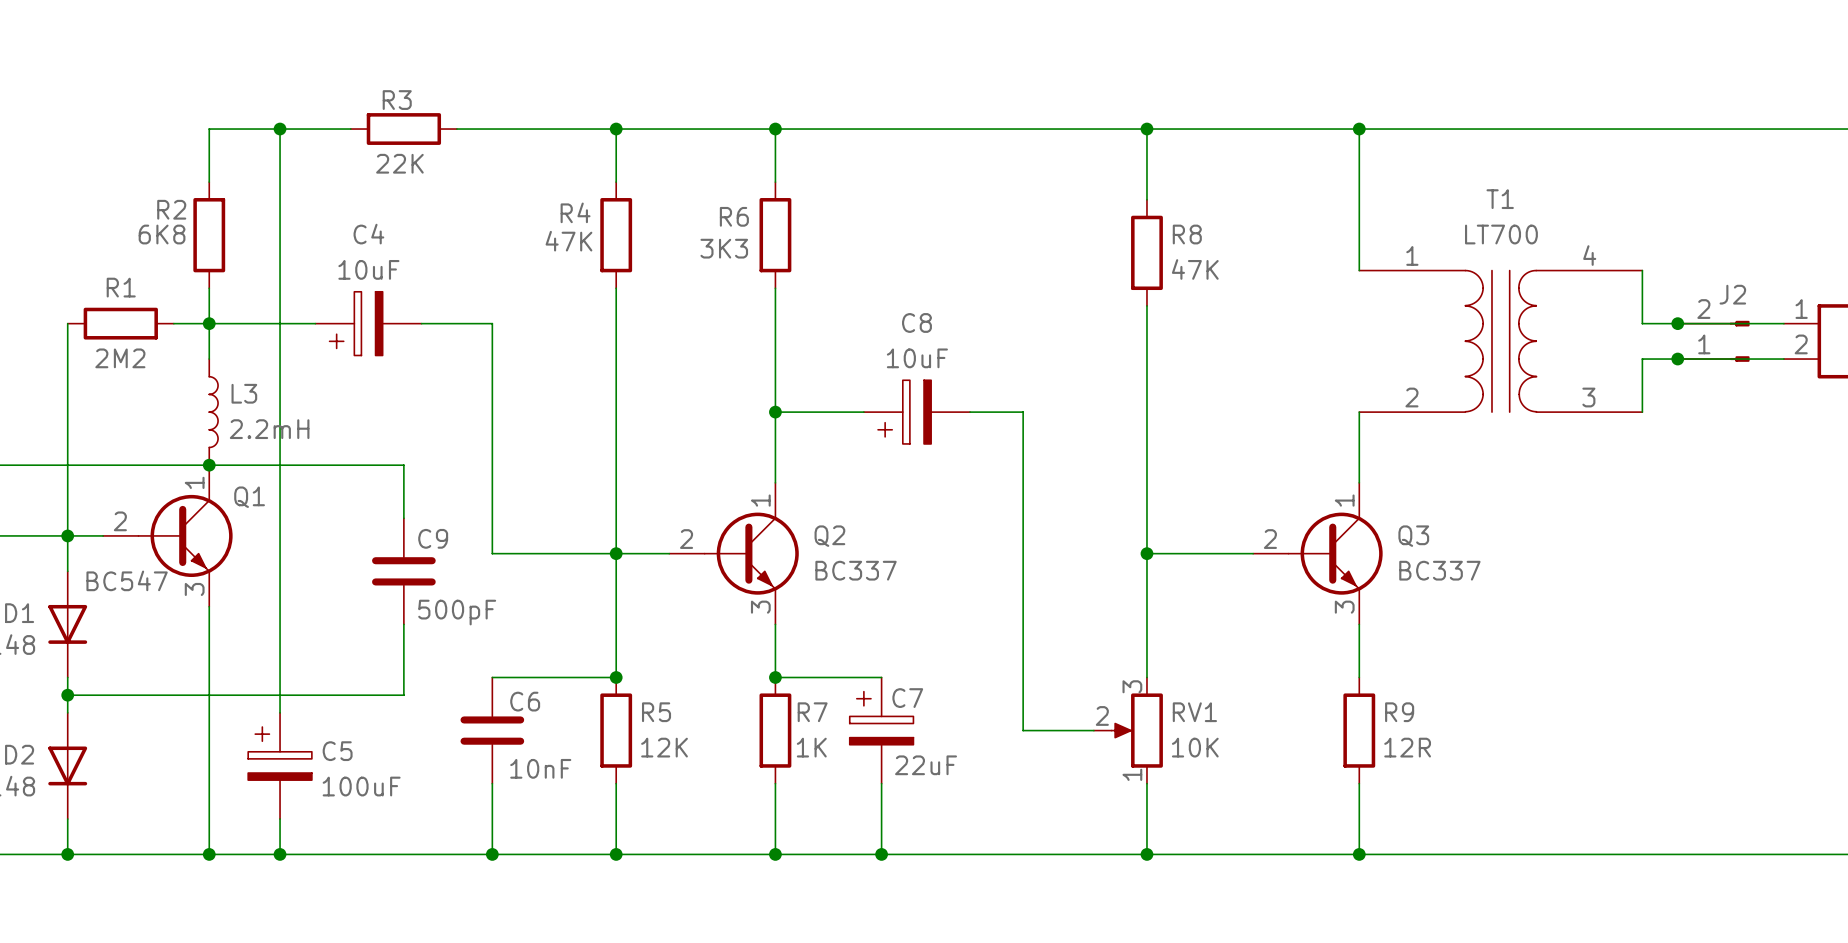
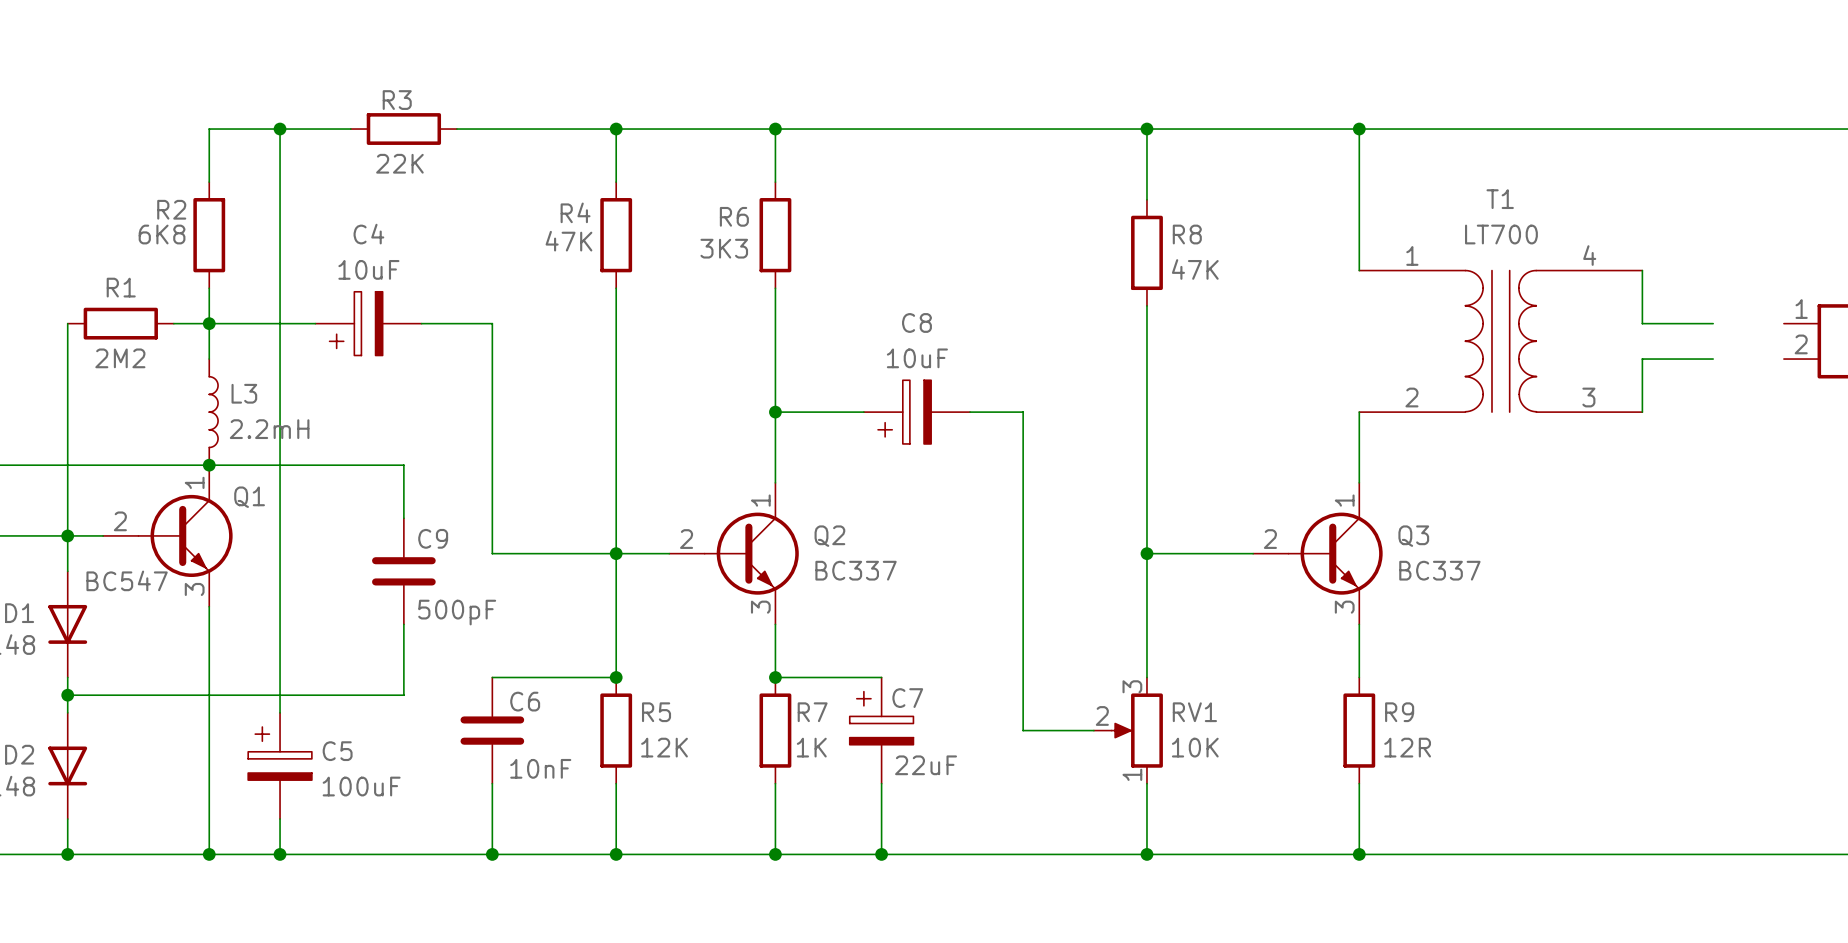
junction: (1677, 323) -> none
wire: (1713, 323) (1783, 323) -> none
J2: (1713, 341) -> none
junction: (1677, 359) -> none
wire: (1713, 359) (1783, 359) -> none

